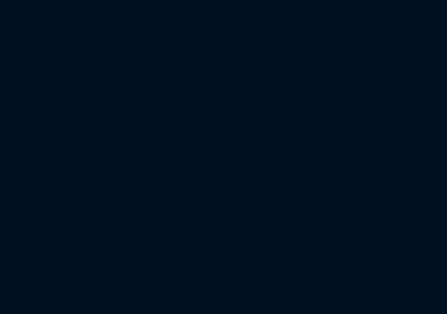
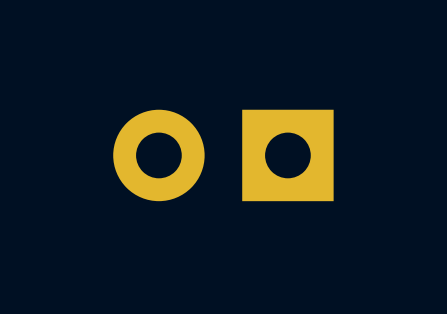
part: none -> (223, 155)

